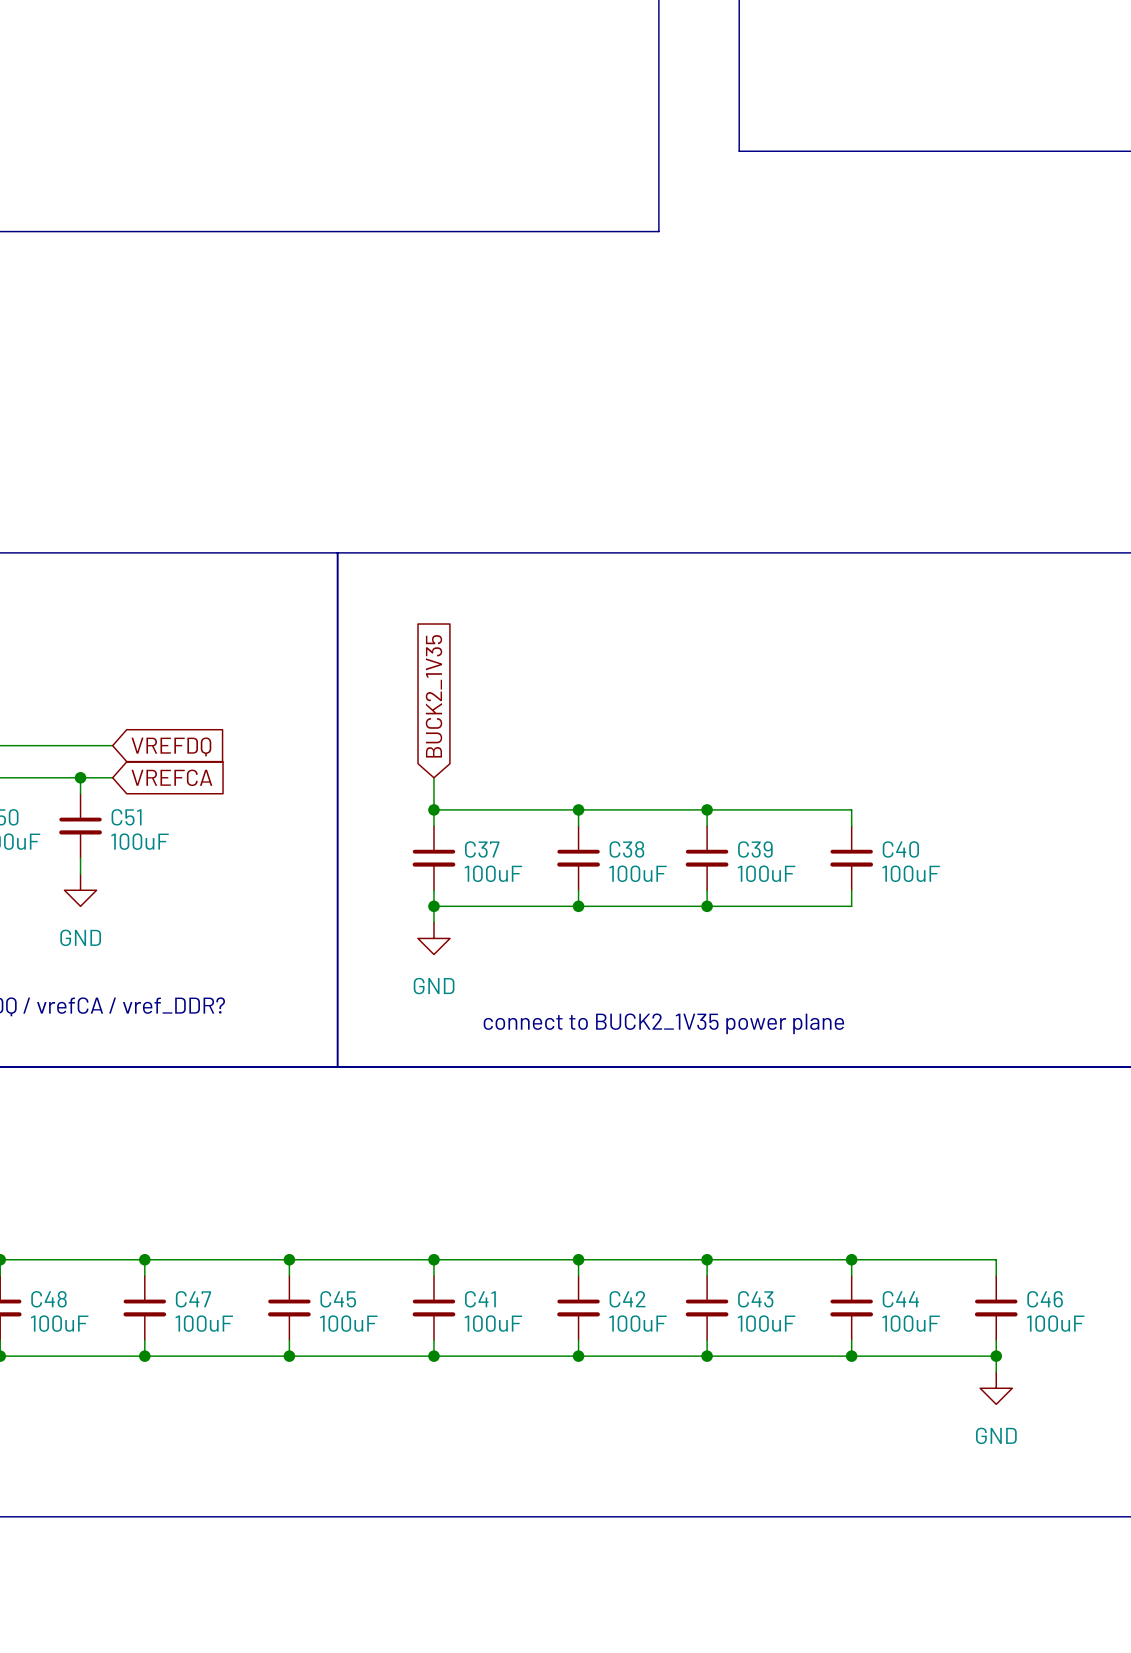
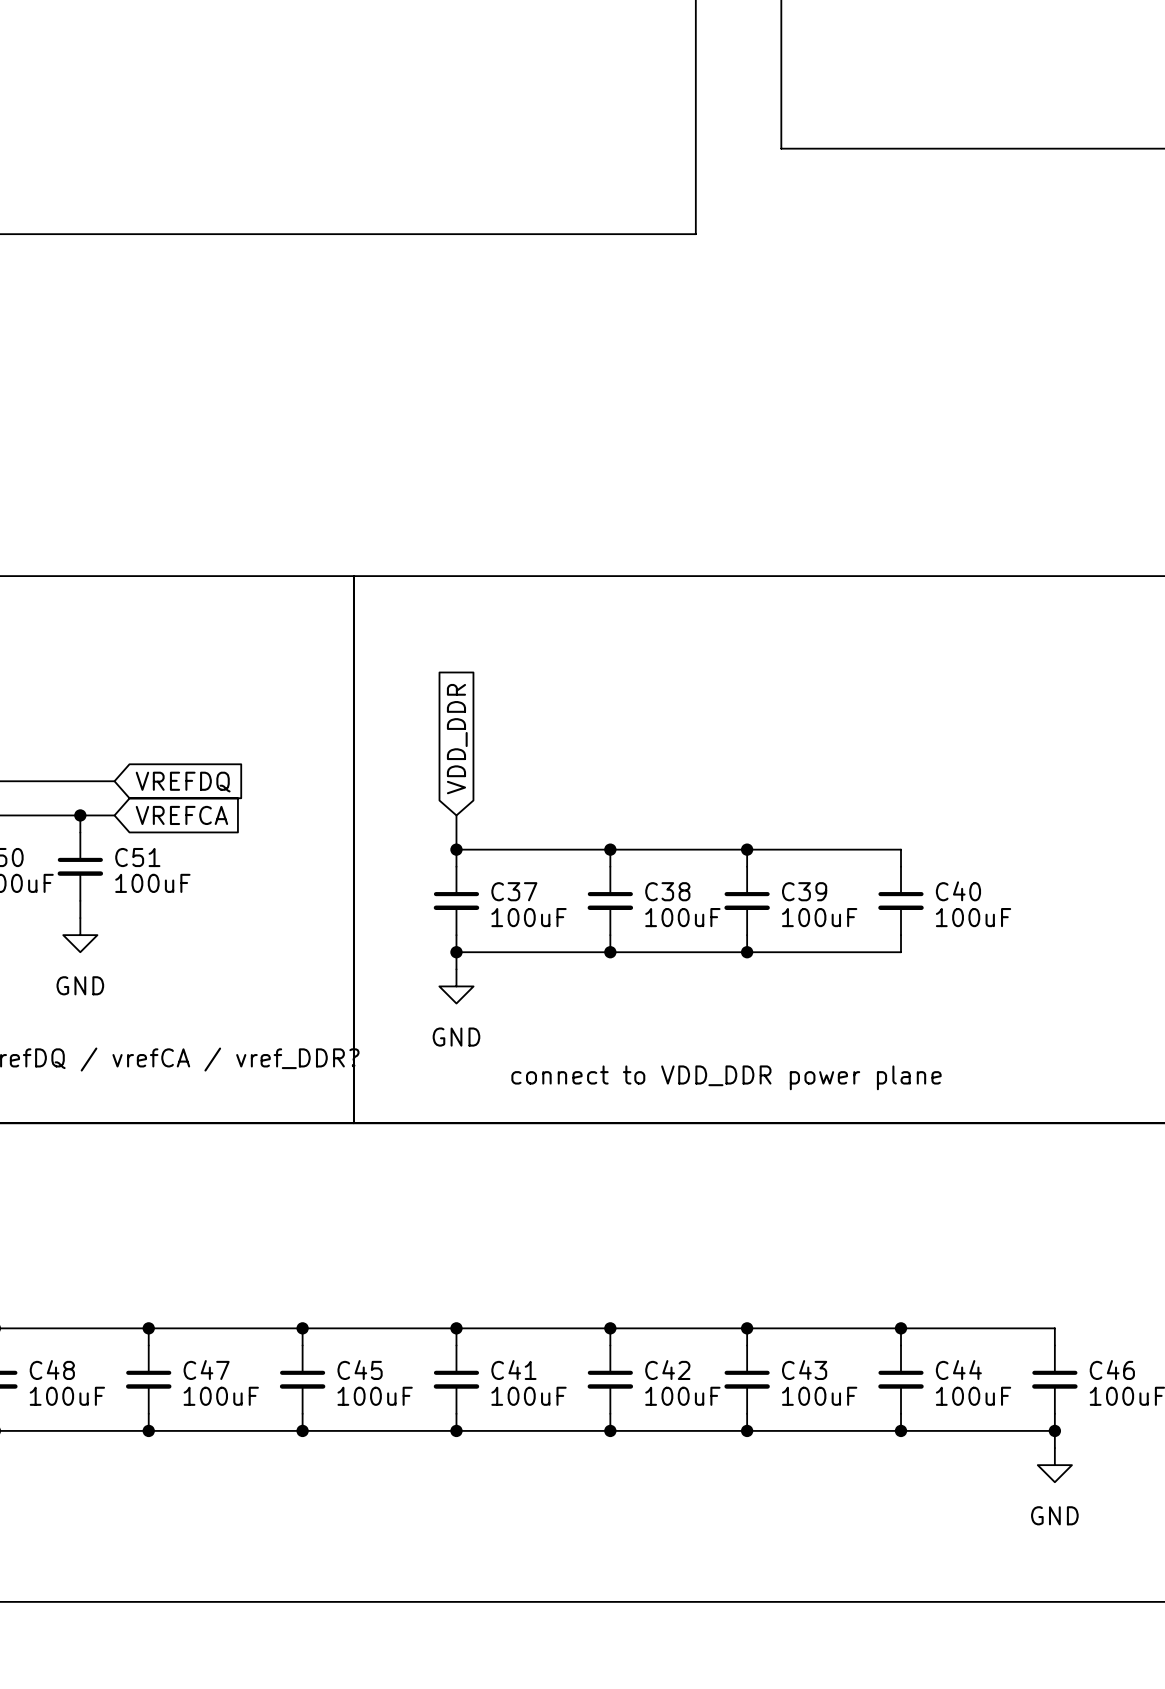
global label: BUCK2_1V35 (433, 696) -> VDD_DDR (457, 739)
text: connect to BUCK2_1V35 power plane (663, 1023) -> connect to VDD_DDR power plane (726, 1077)

